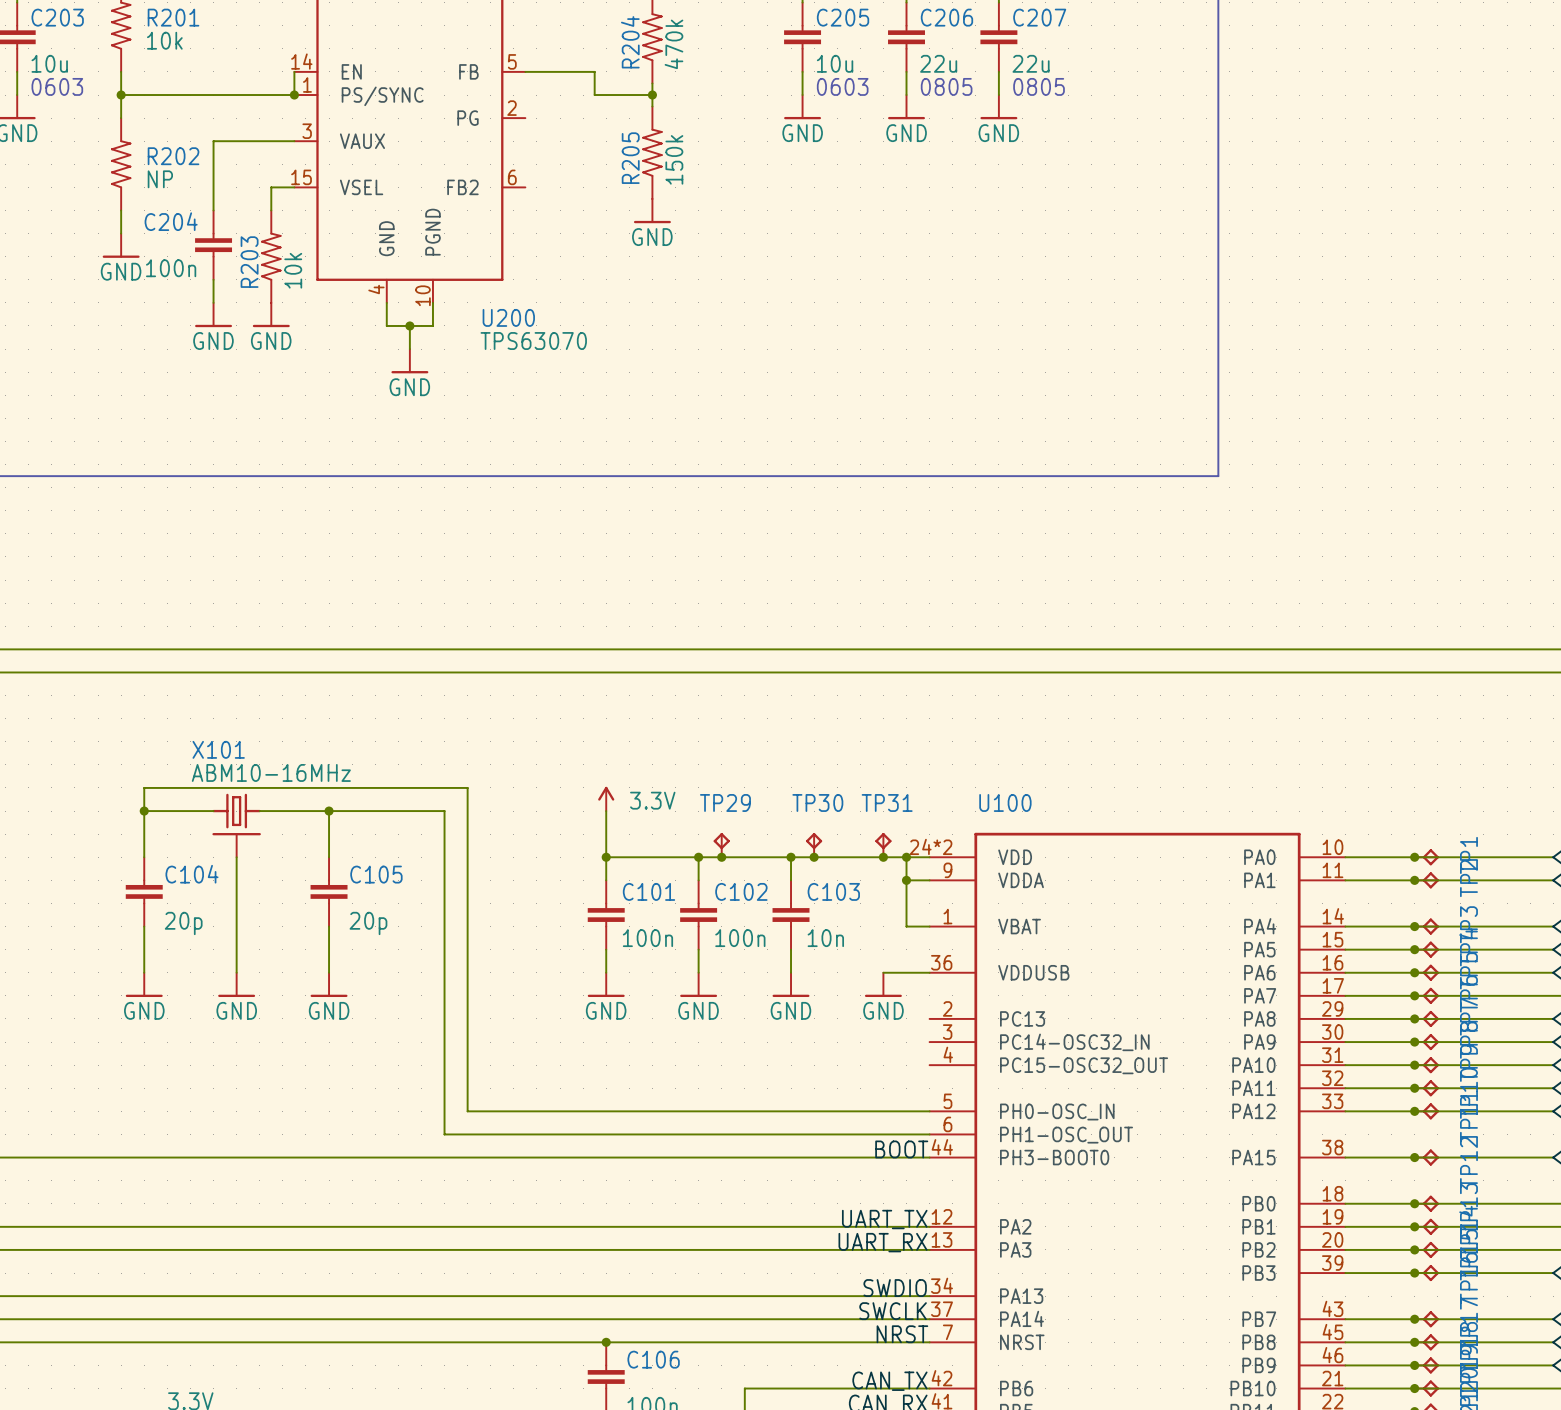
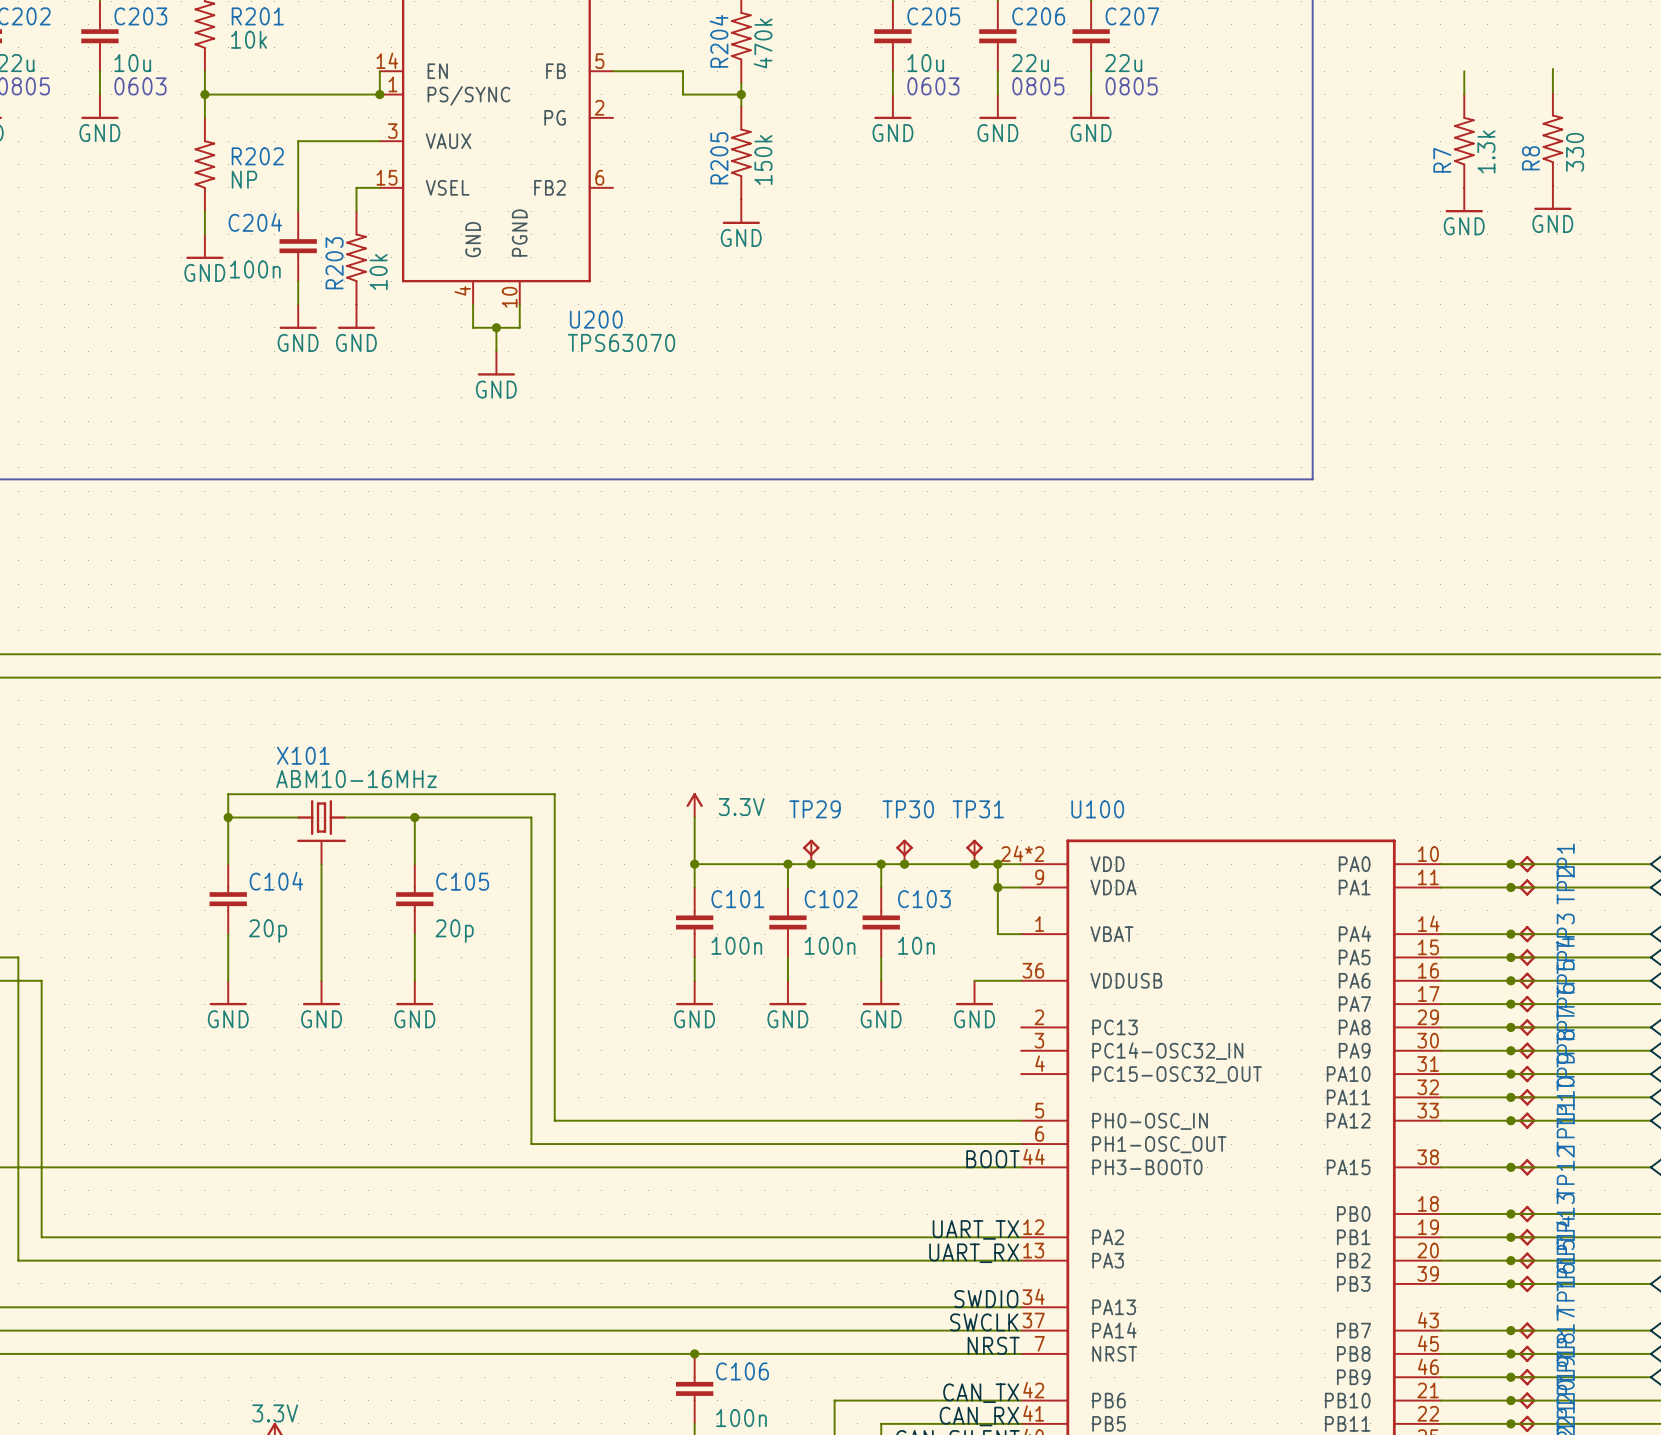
wire: none -> (1552, 68) (1552, 92)
wire: none -> (1464, 71) (1464, 94)
R8: none -> 330 (1552, 138)
R7: none -> 1.3k (1464, 141)
power symbol: none -> GND (1552, 197)
power symbol: none -> GND (1464, 200)

